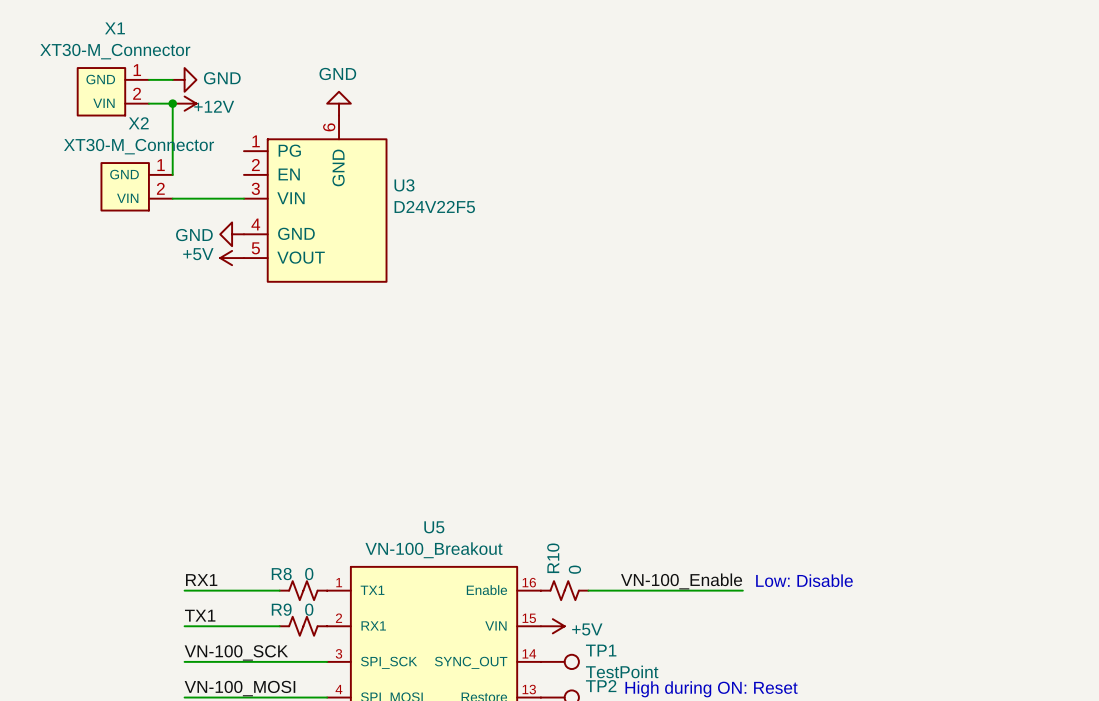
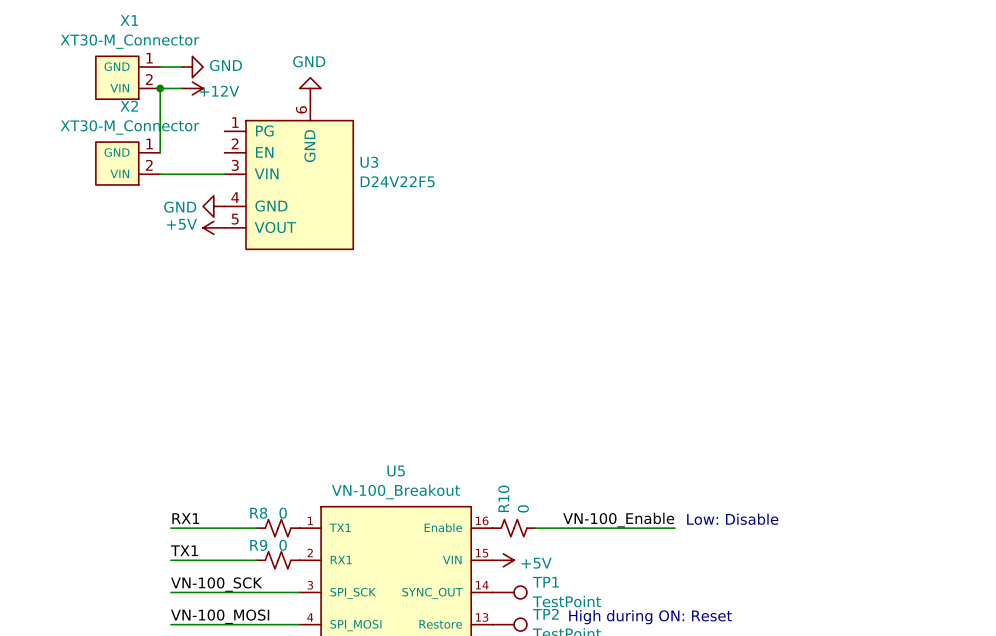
power symbol position: GND (184, 79) -> GND (192, 67)
X1 position: (113, 91) -> (128, 77)
power symbol position: +12V (184, 103) -> +12V (192, 88)

